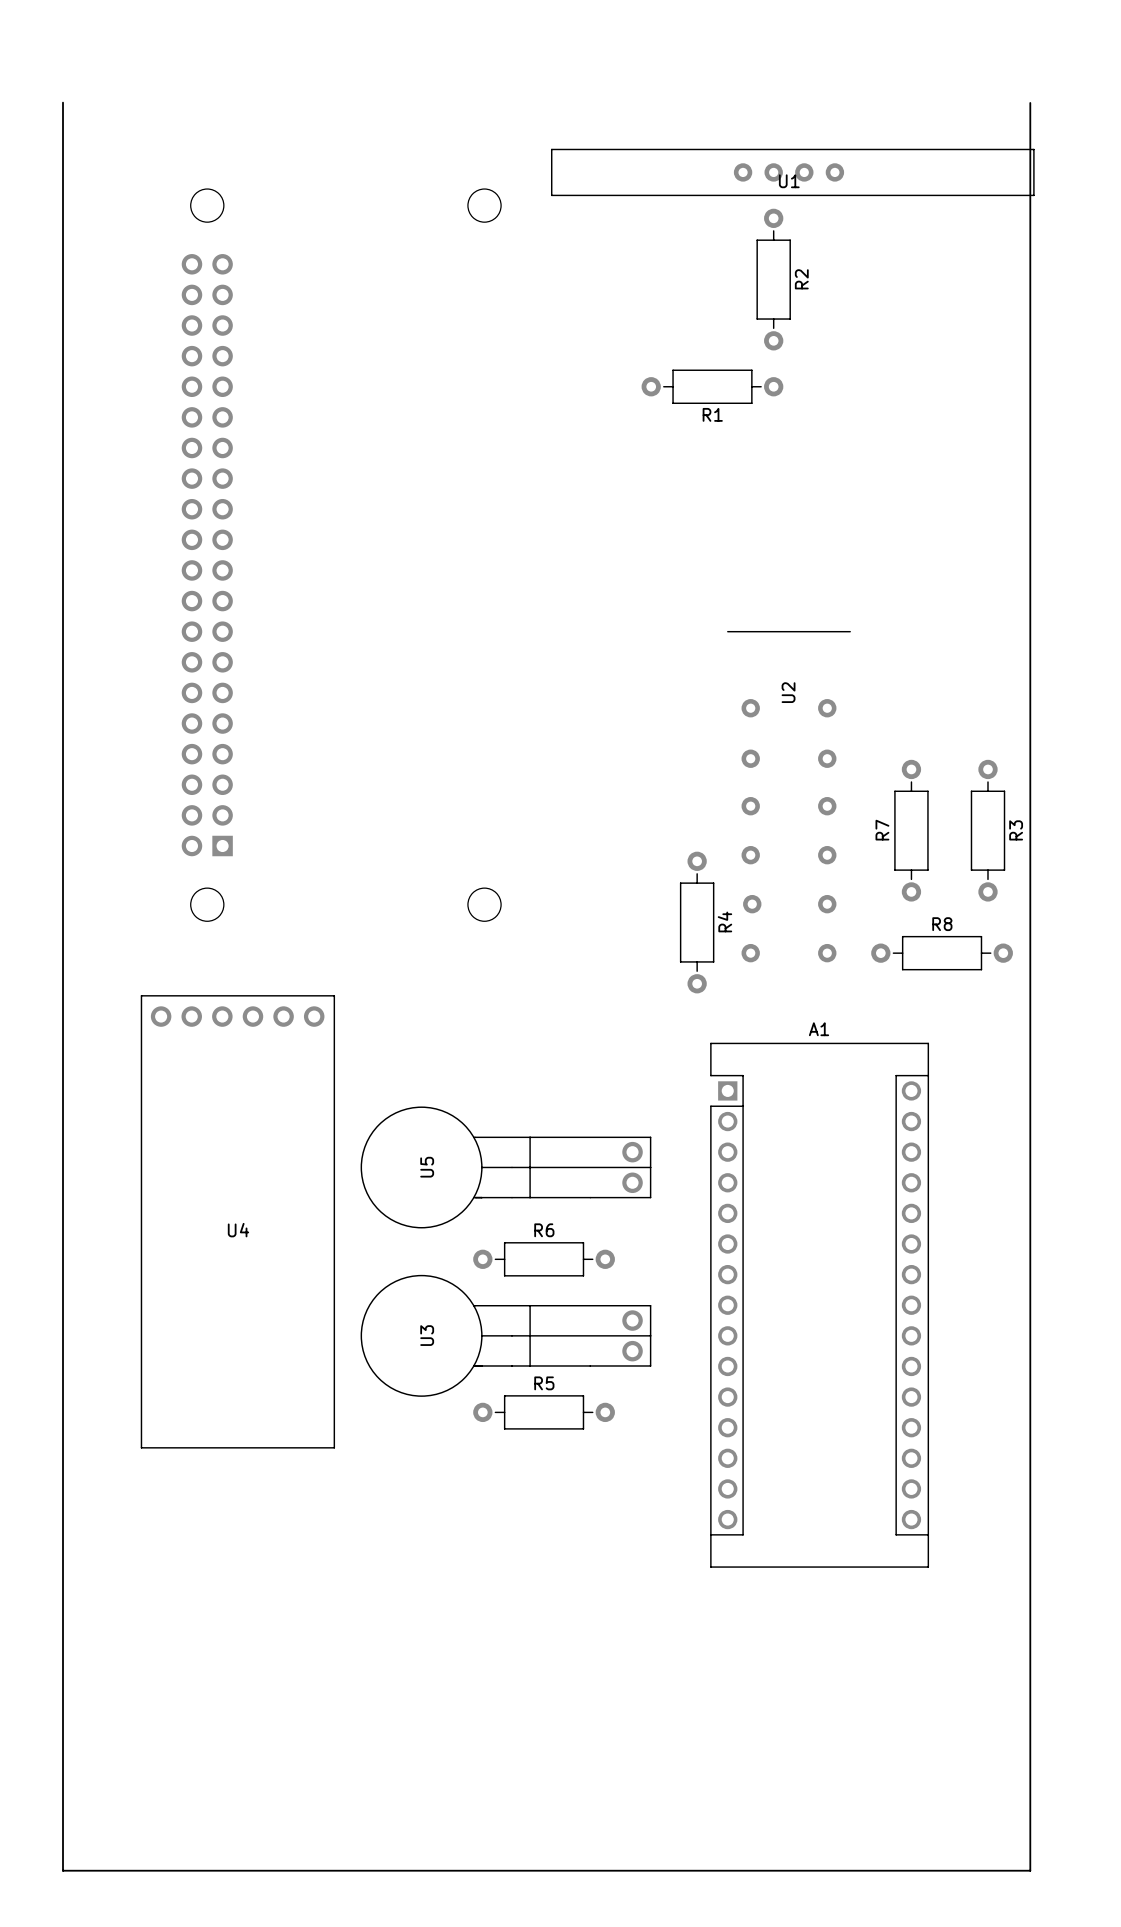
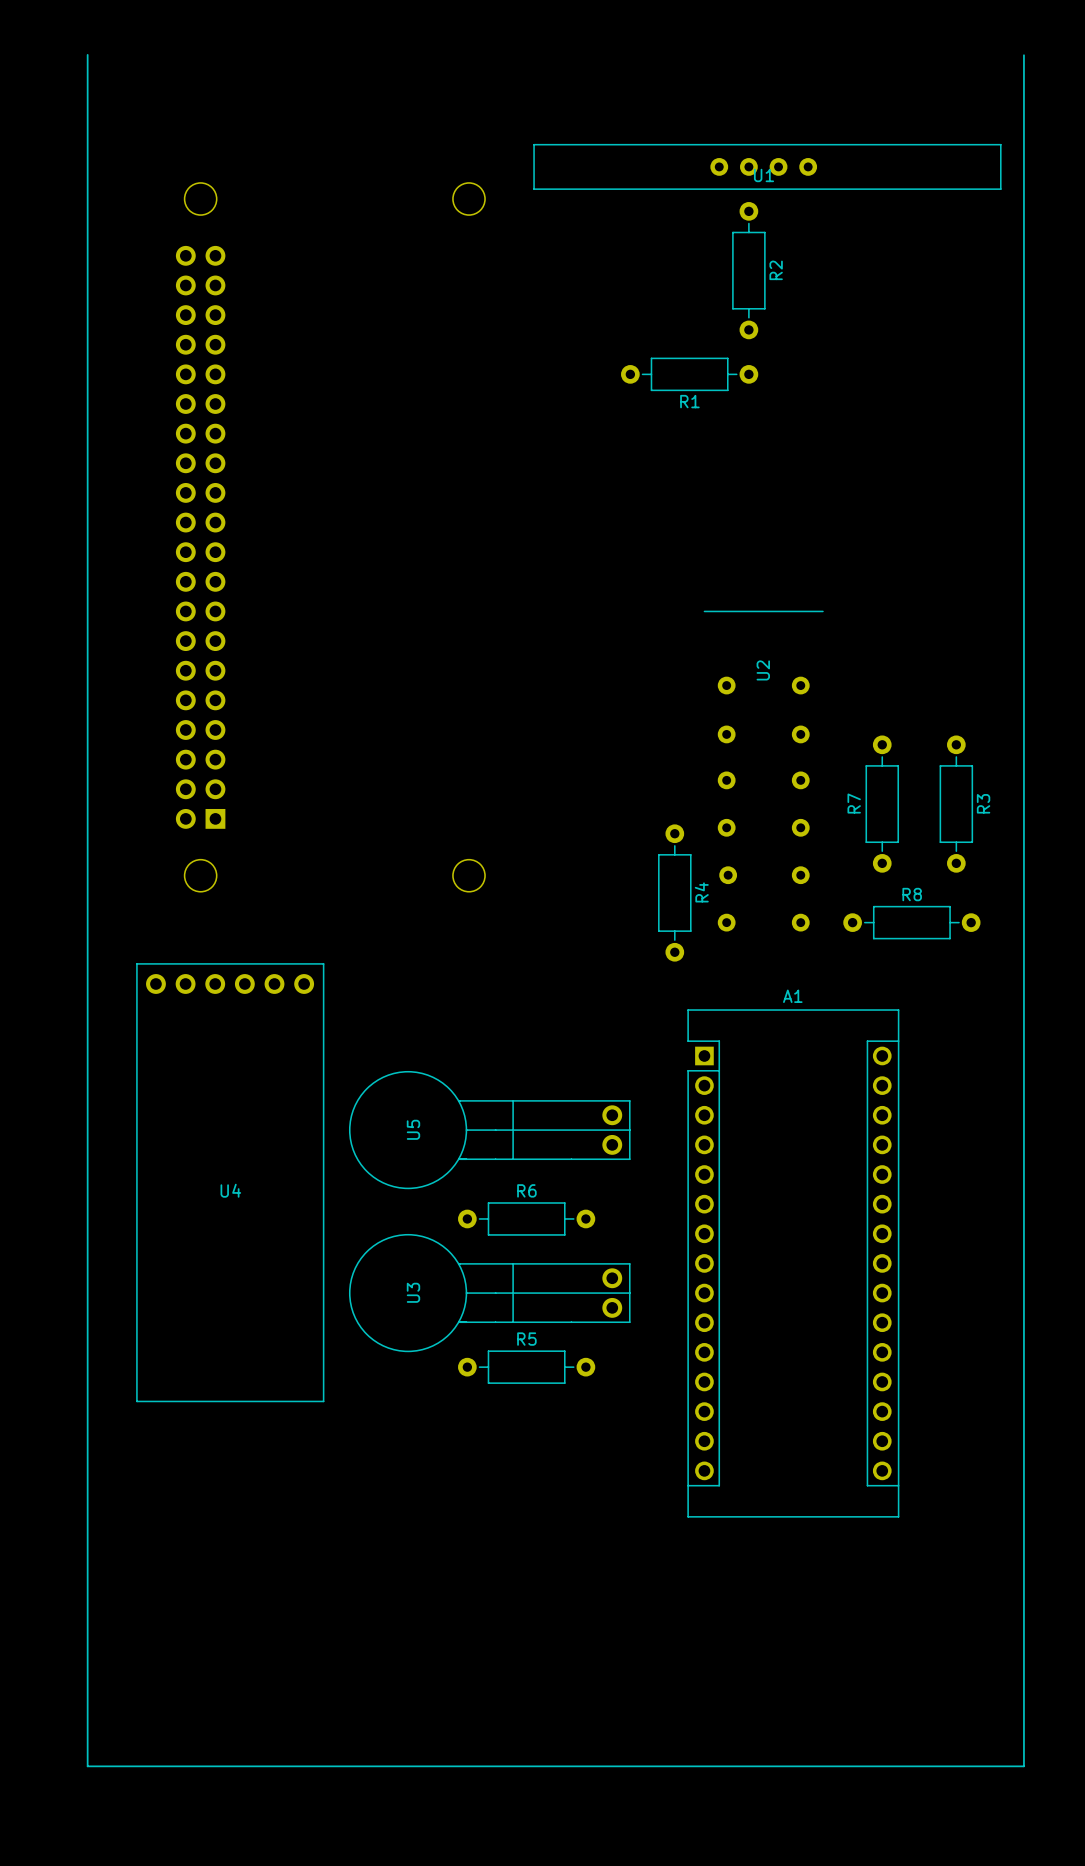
line: (63, 102) (63, 1870) (1030, 1870) (1030, 102) -> (87, 54) (87, 1766) (1023, 1766) (1023, 55)

